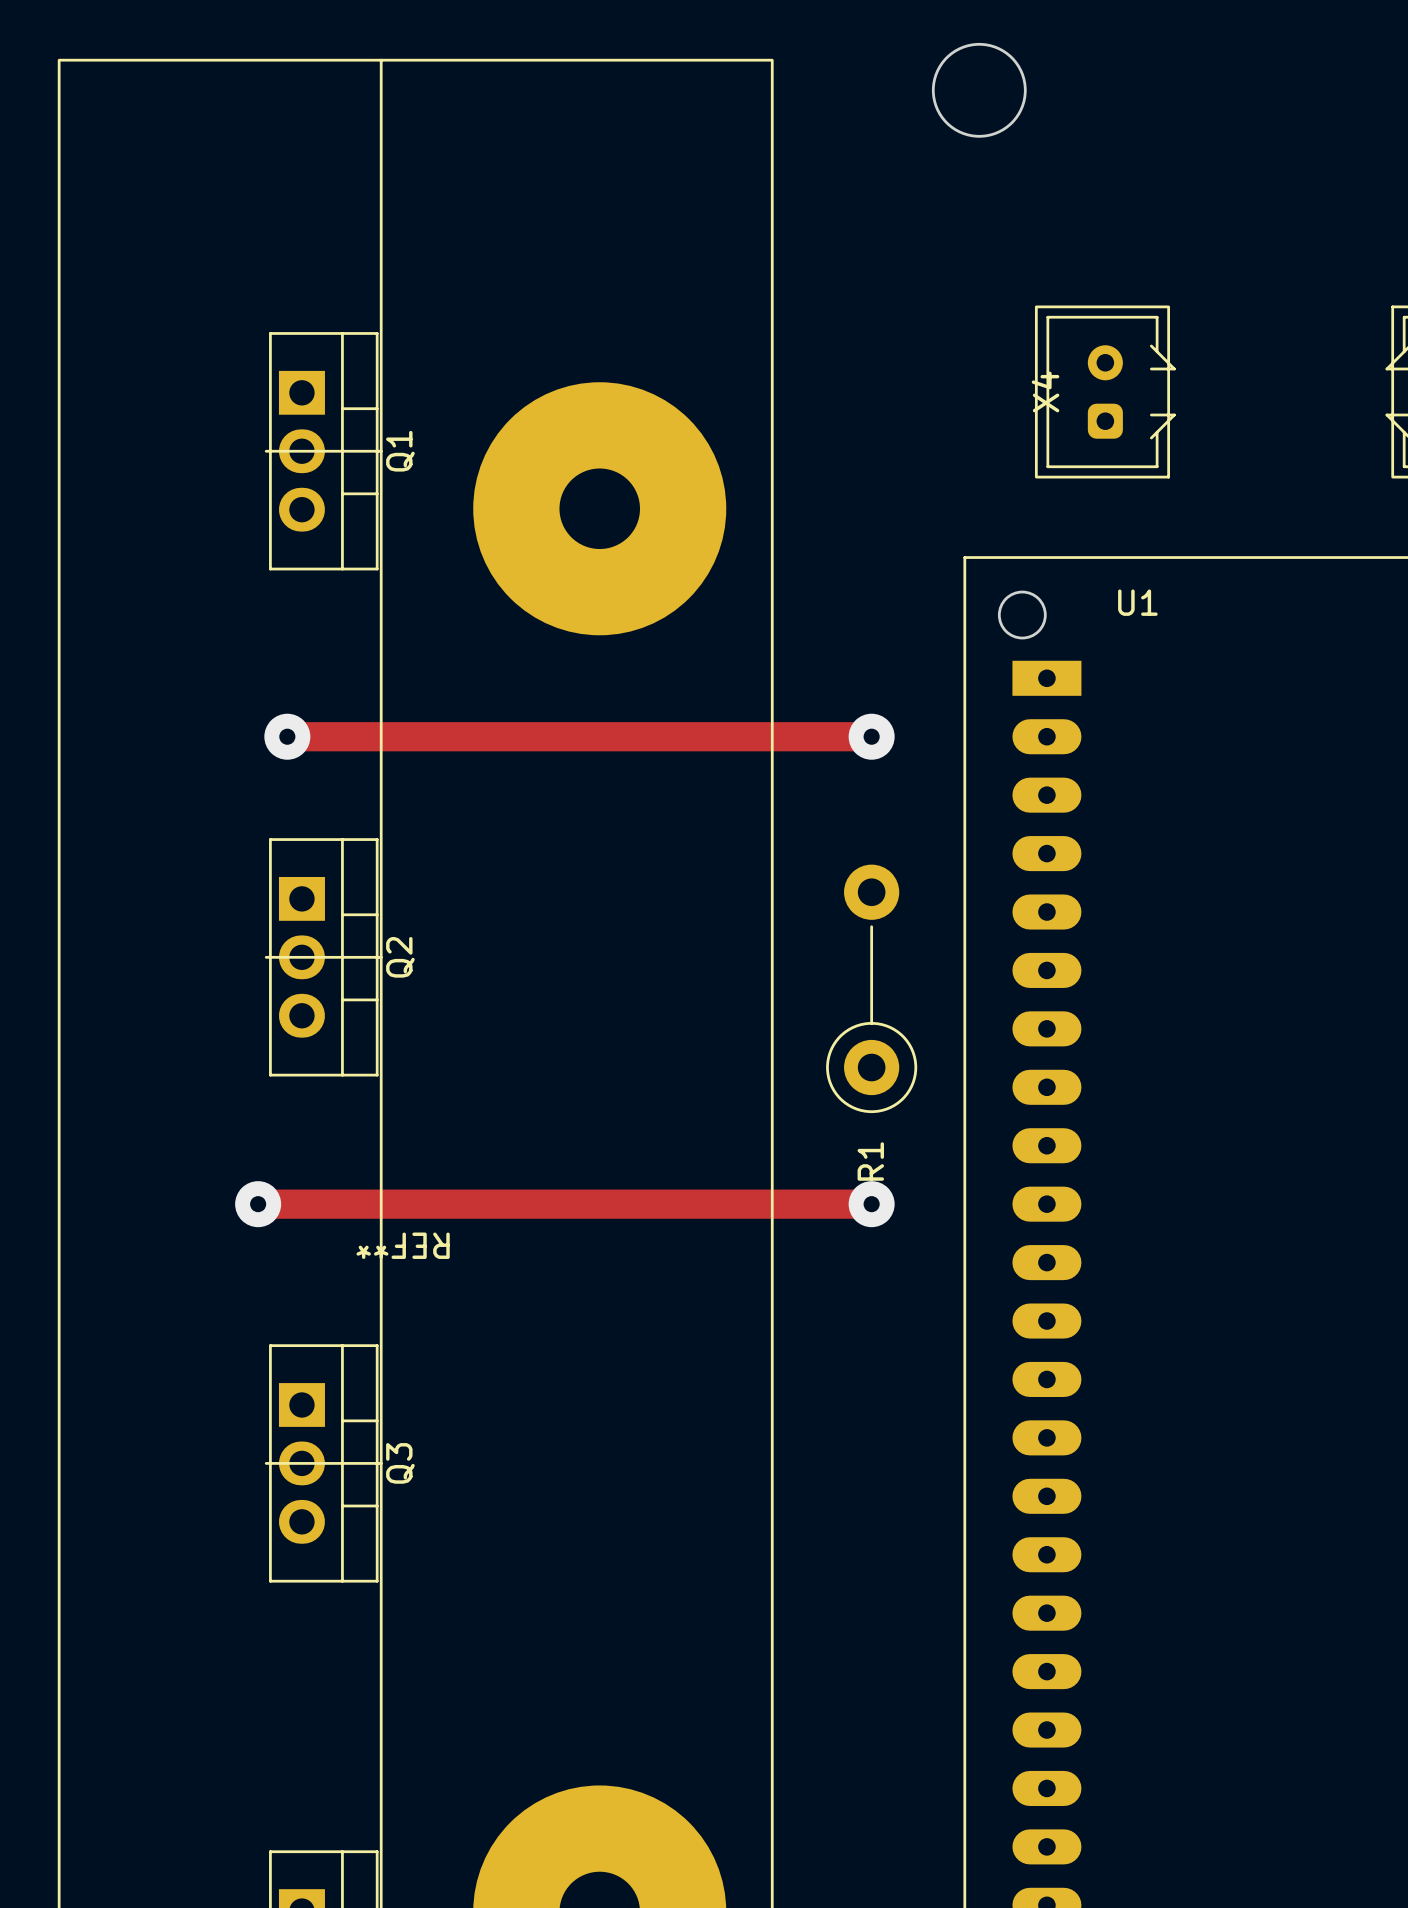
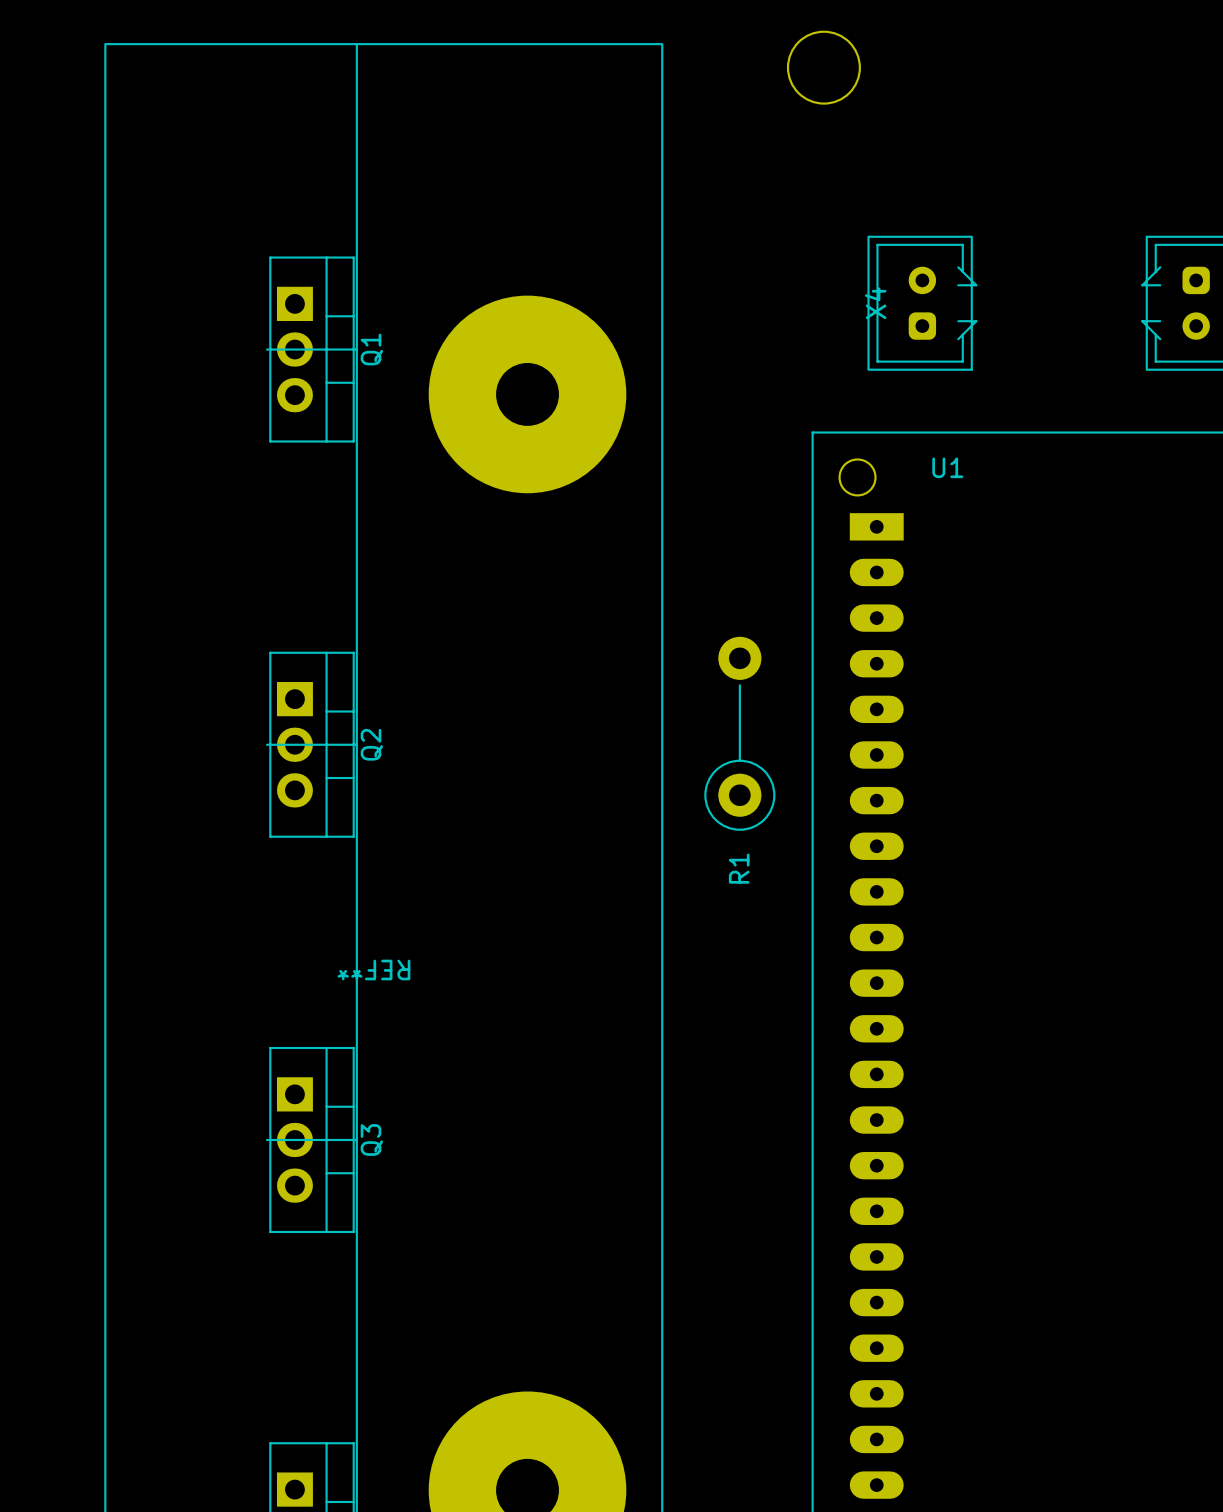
track: (287, 736) (871, 736) -> none
via: (287, 736) -> none
via: (871, 736) -> none
R1 position: (871, 988) -> (739, 733)
track: (258, 1204) (871, 1204) -> none
via: (258, 1204) -> none
via: (871, 1204) -> none

